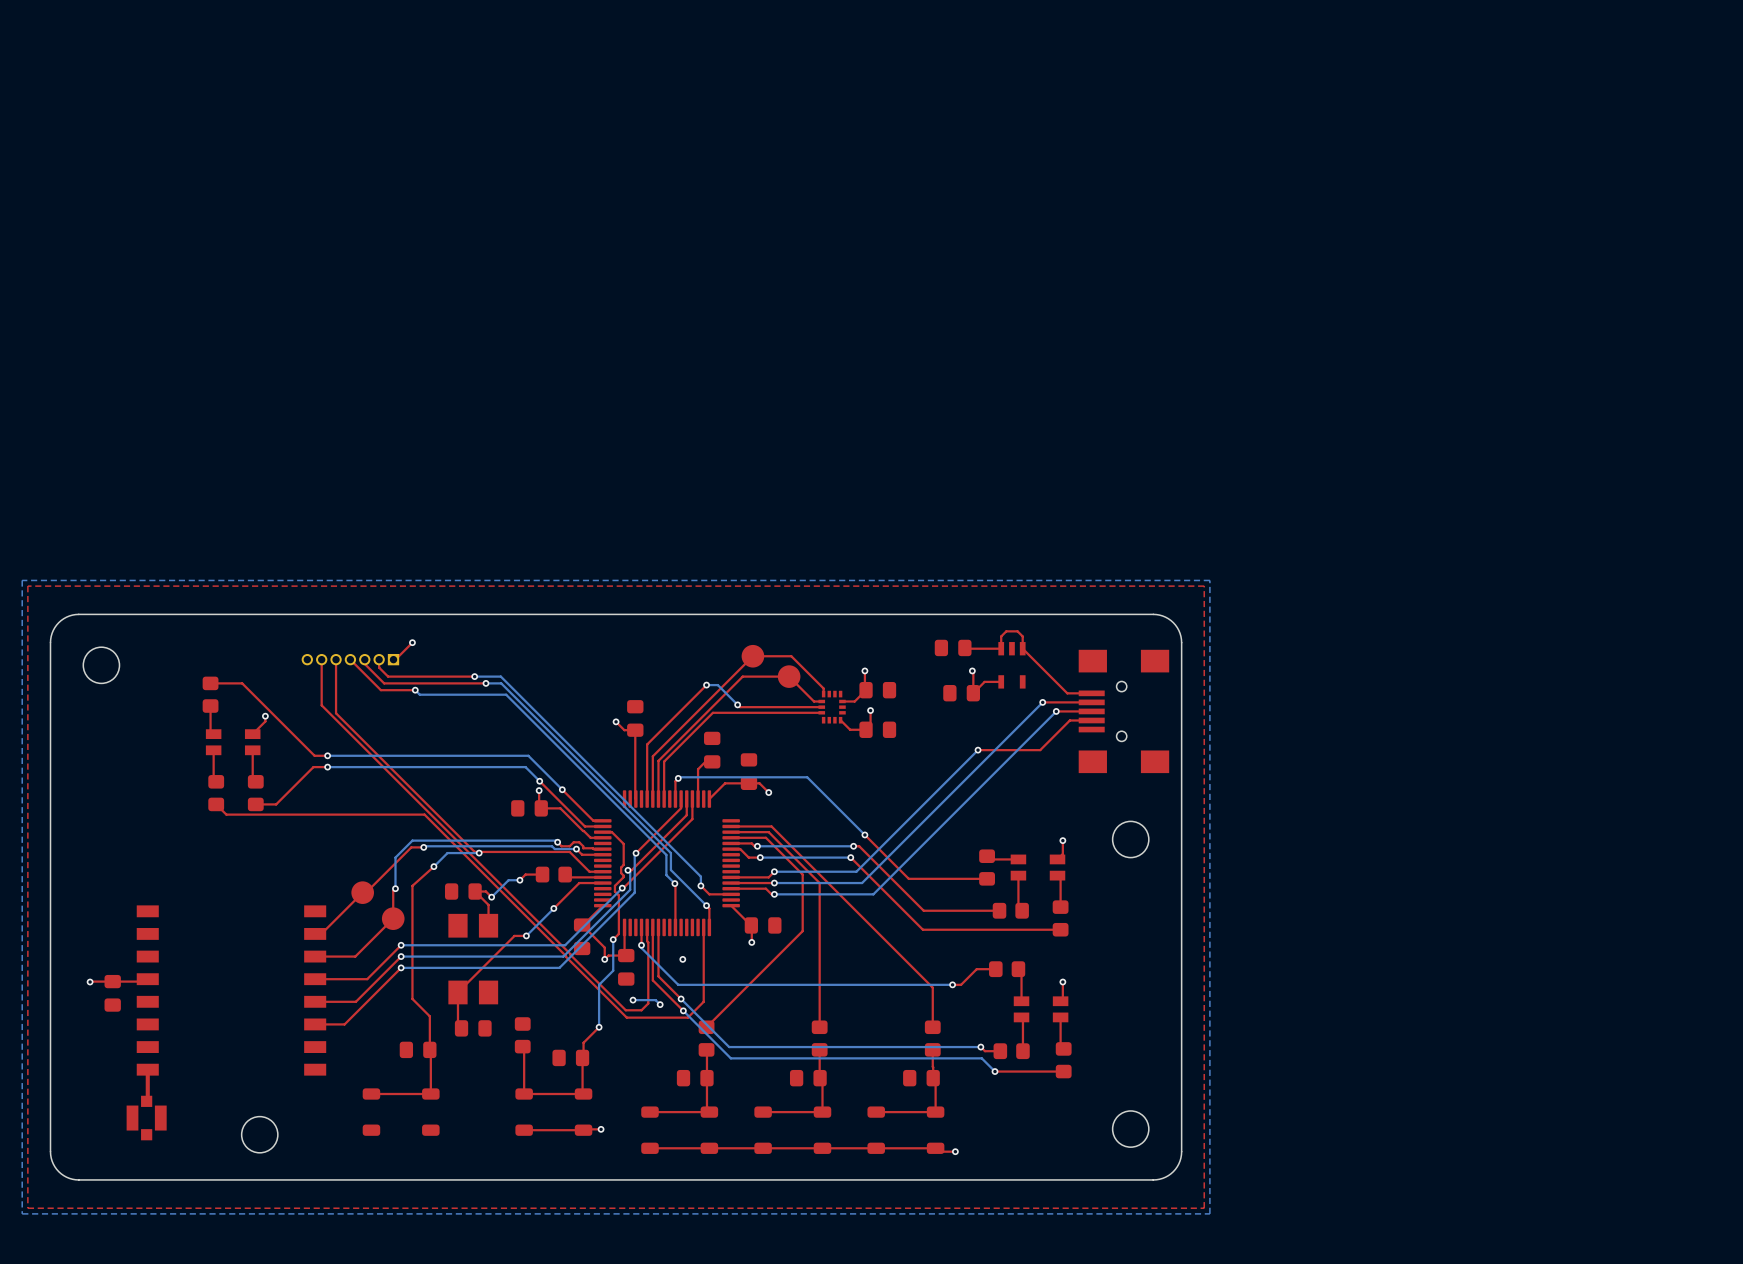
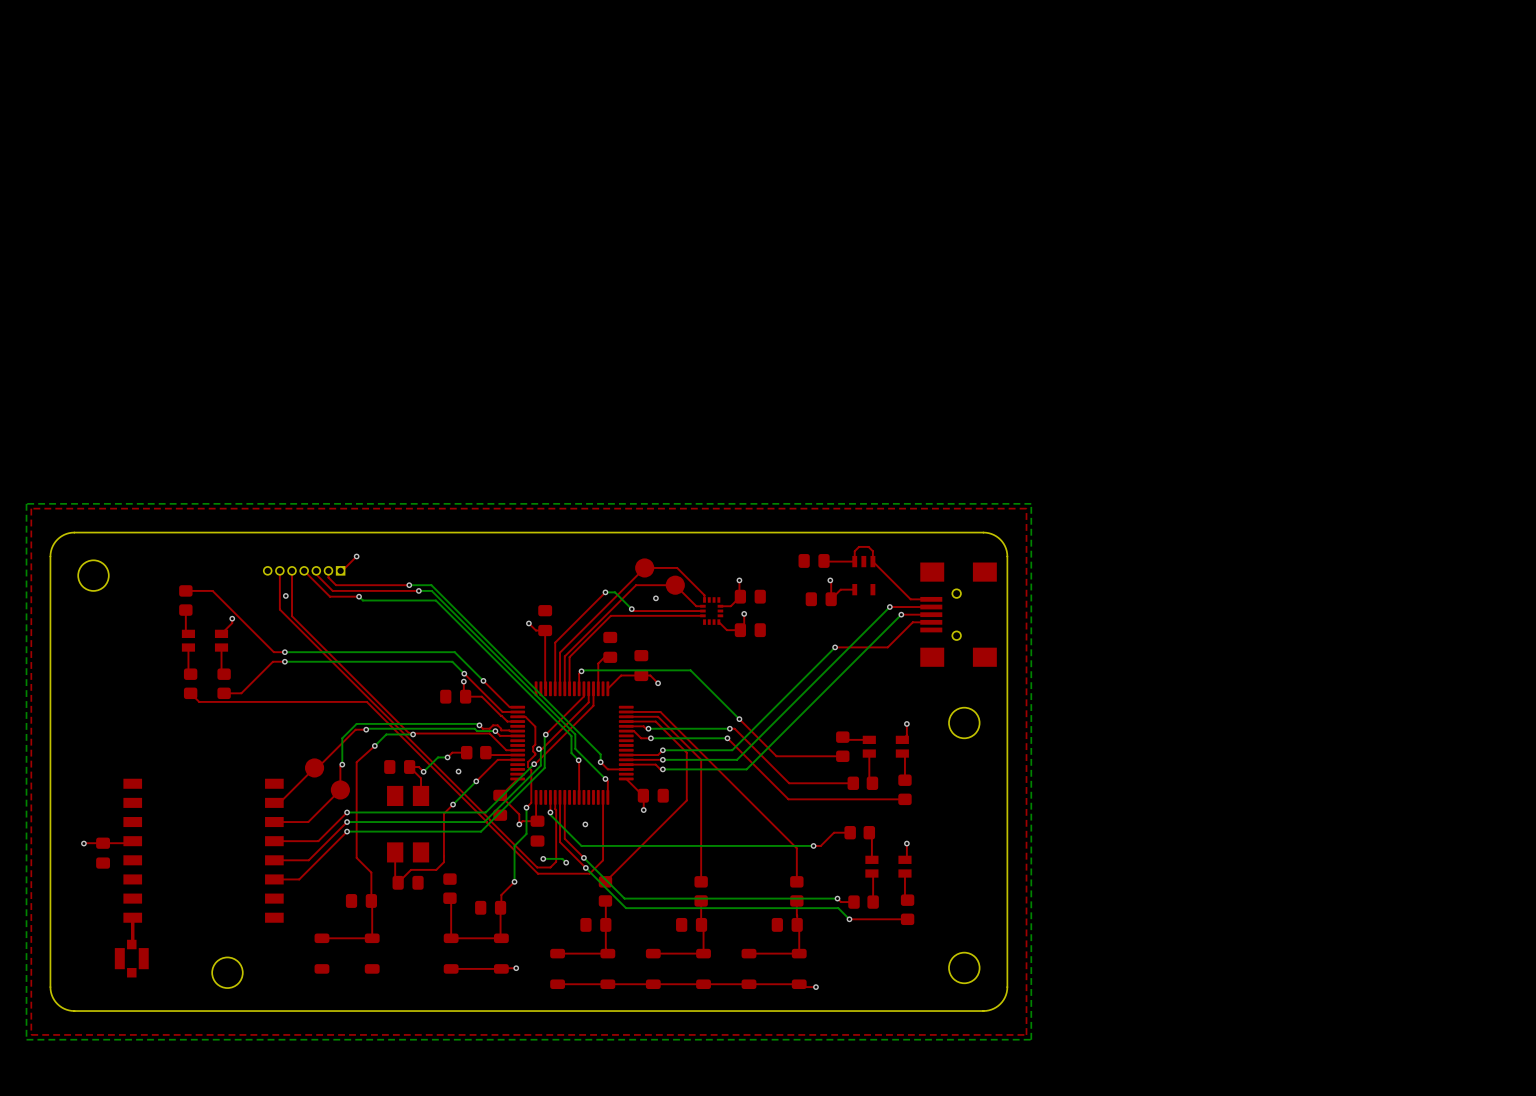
via: none -> (285, 595)
via: none -> (655, 598)
via: none -> (458, 771)
top track: (526, 935) (514, 935) (457, 992) -> (453, 804) (443, 813) (443, 862) (436, 869) (411, 869) (398, 882)

